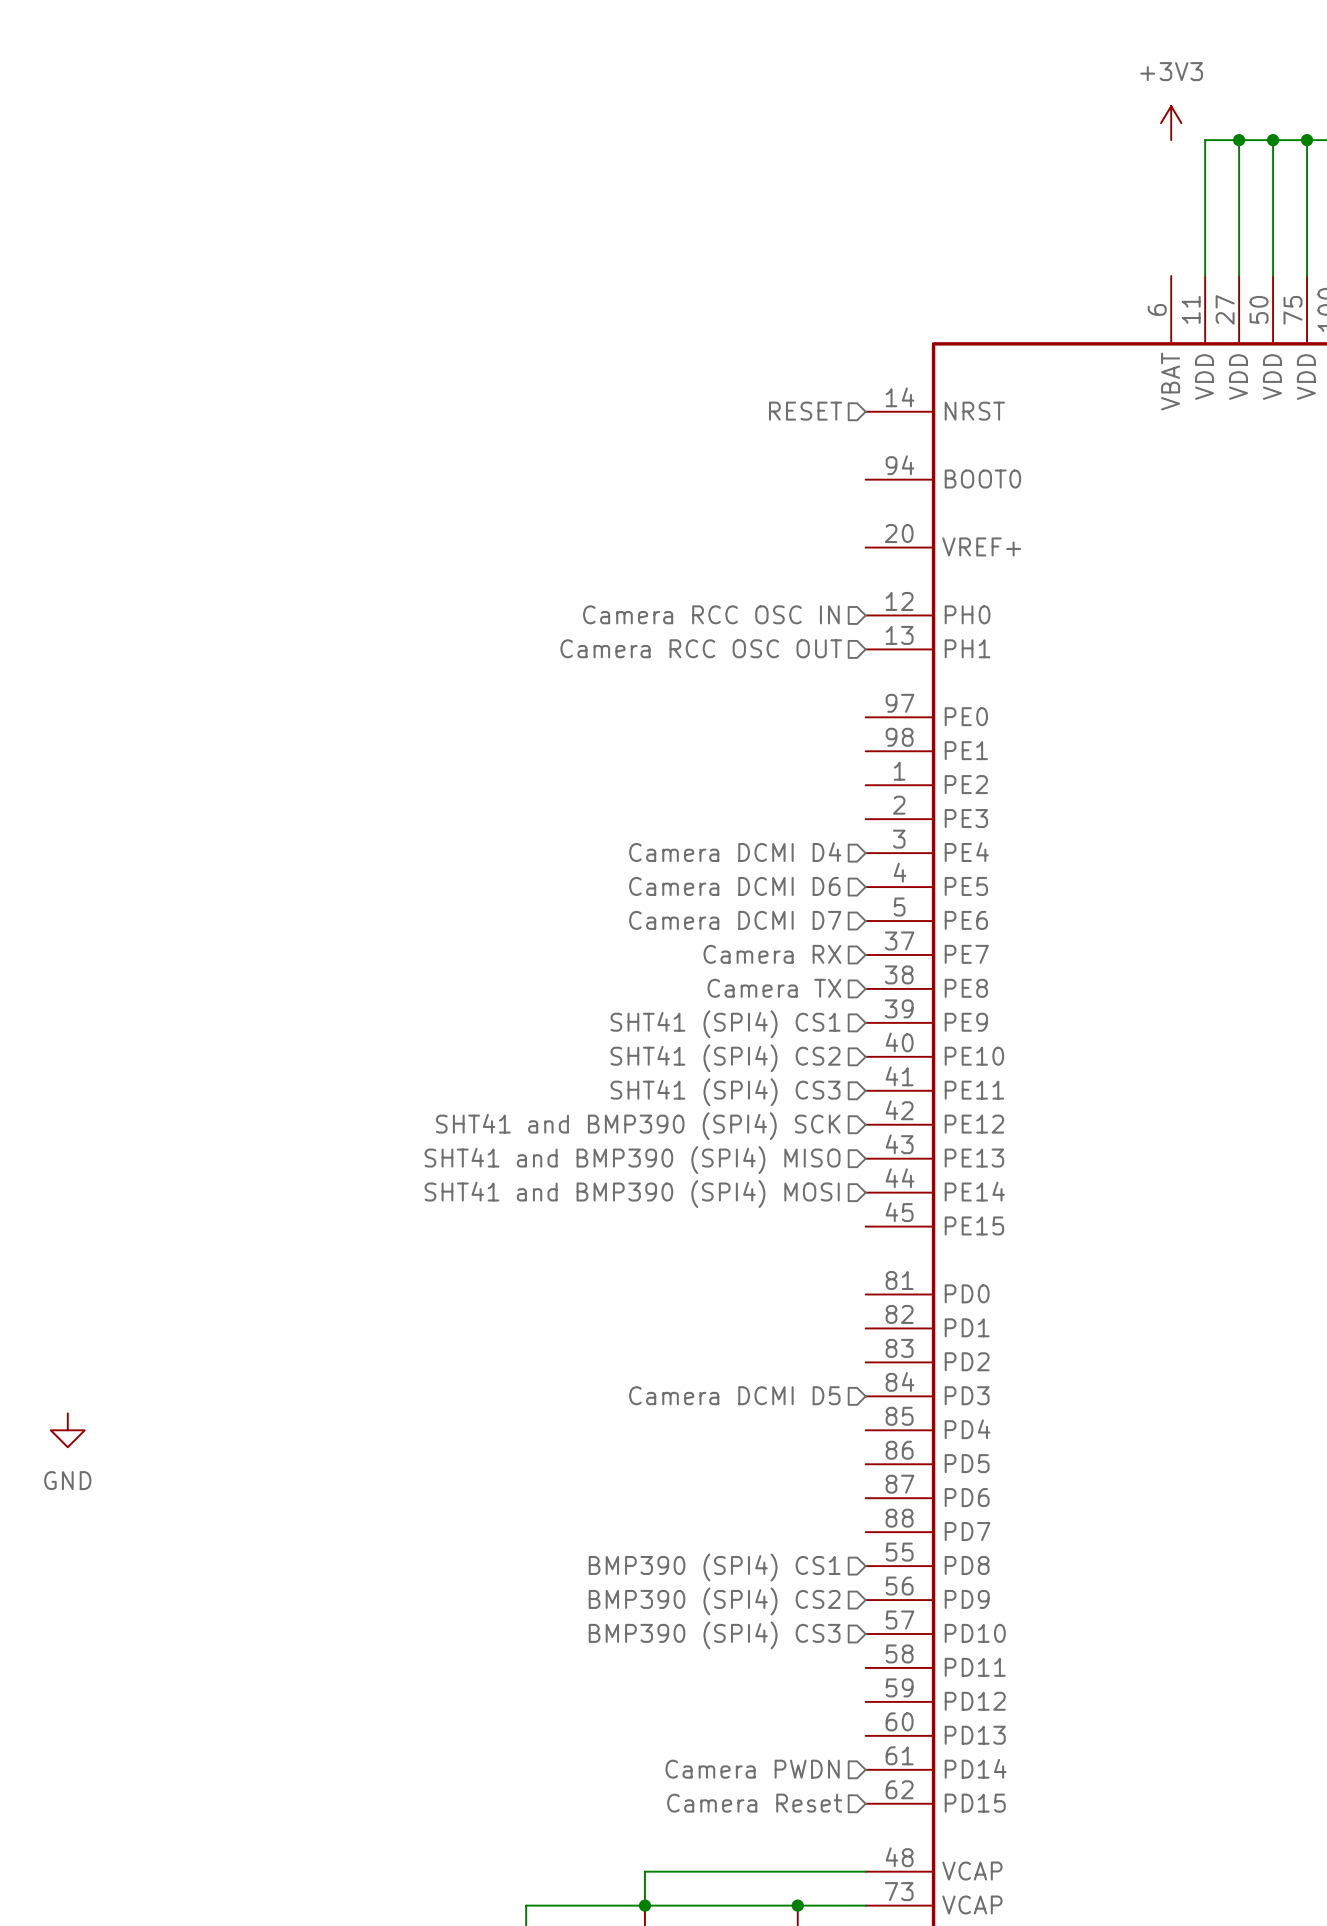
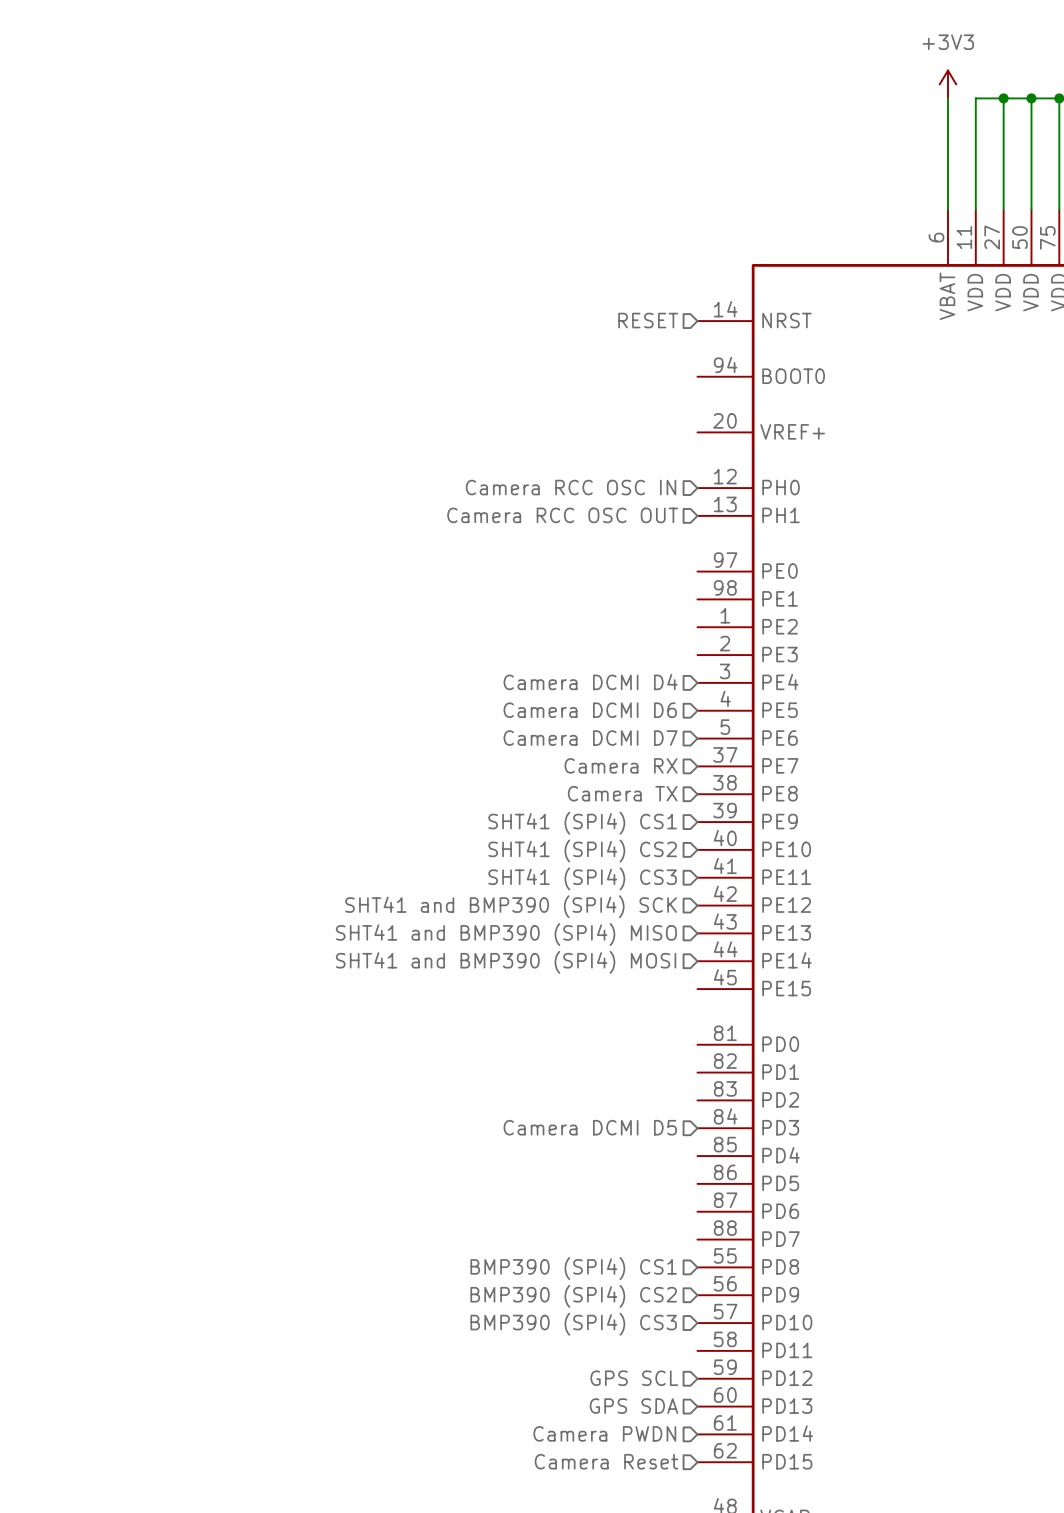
wire: none -> (947, 98) (947, 209)
power symbol: GND (67, 1430) -> none
hierarchical label: none -> GPS SCL (634, 1378)
hierarchical label: none -> GPS SDA (633, 1406)

